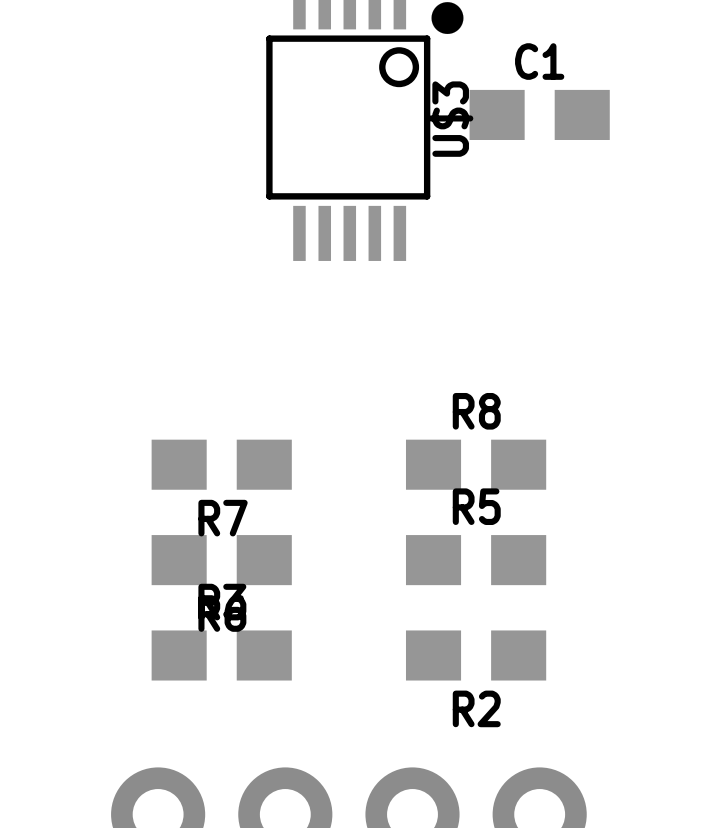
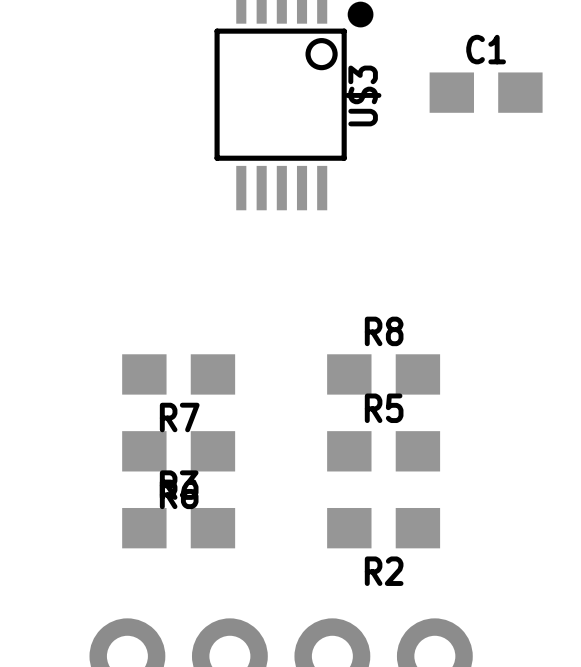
C1 position: (539, 114) -> (486, 92)

